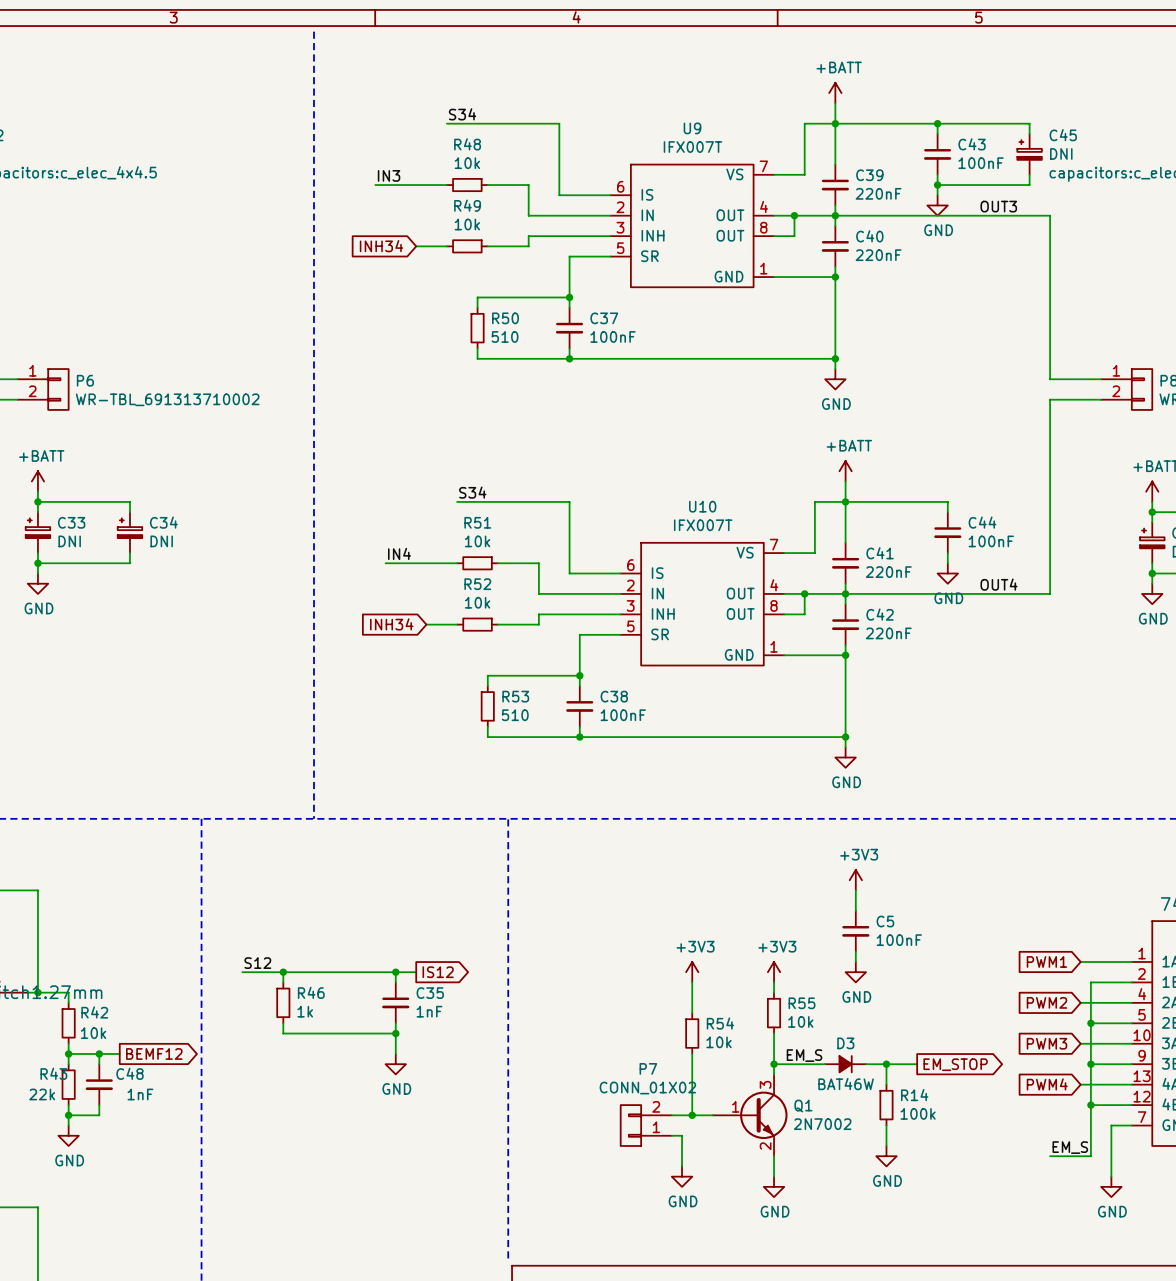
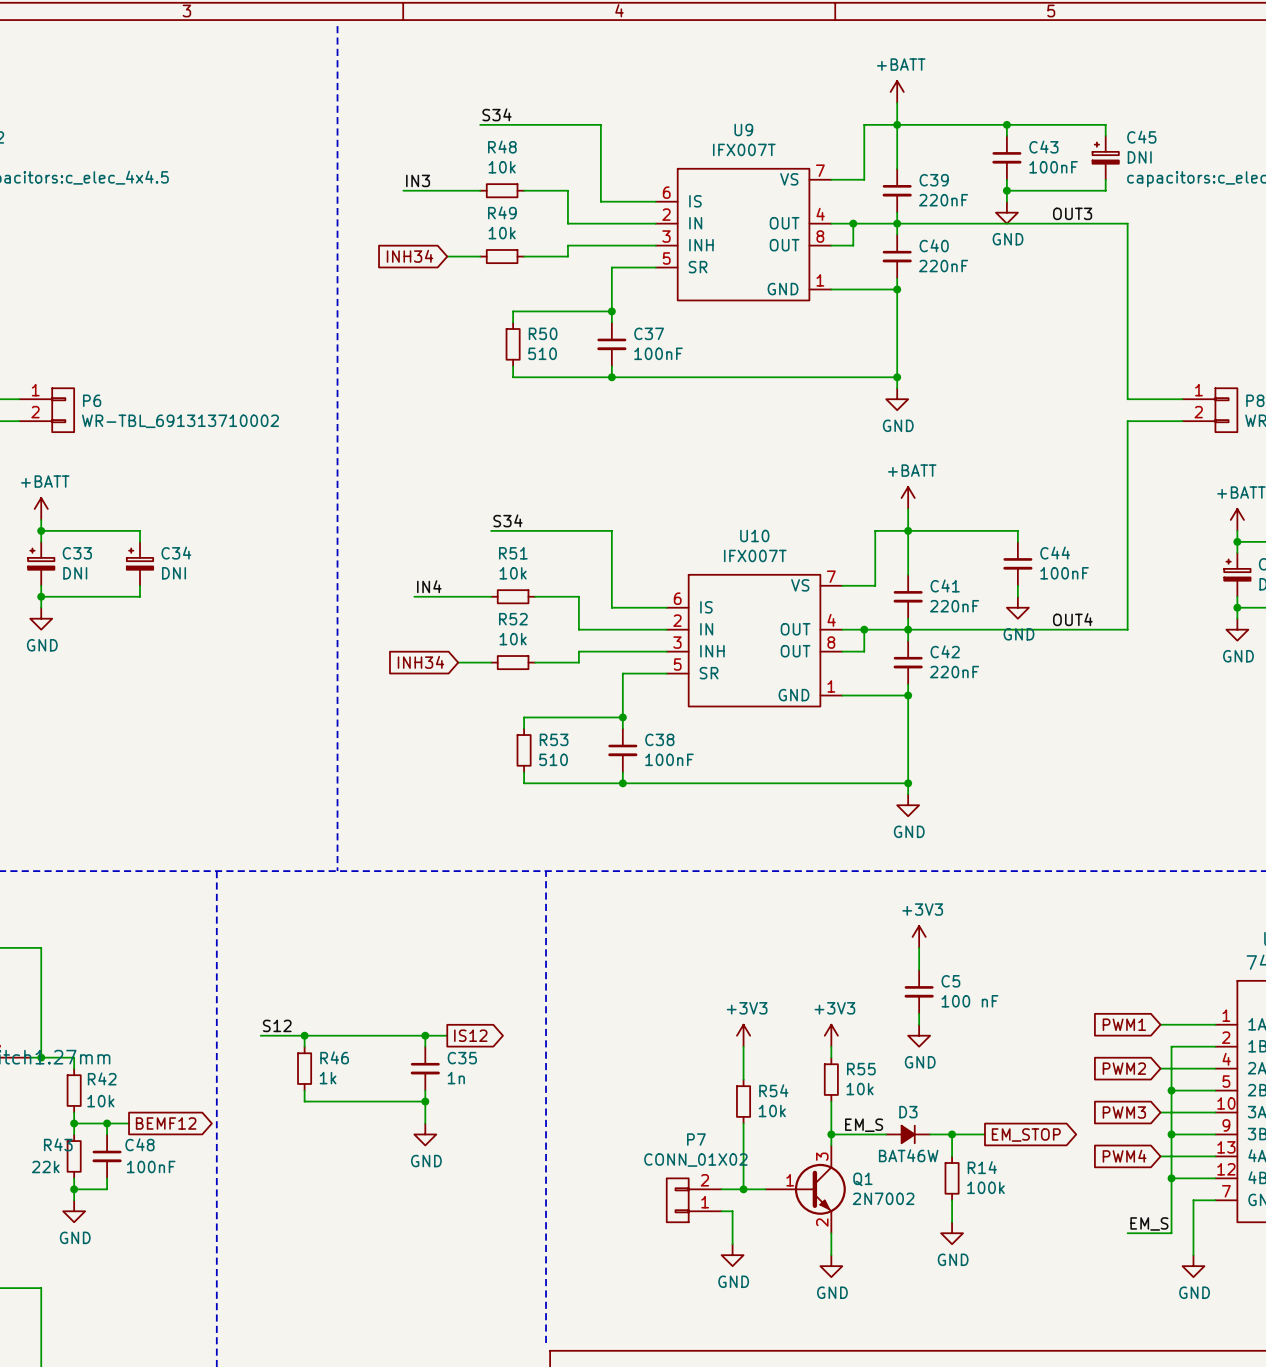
C5 value: 100nF (899, 940) -> 100 nF (969, 1001)
C35 value: 1nF (429, 1011) -> 1n (456, 1078)
C48 value: 1nF (140, 1094) -> 100nF (151, 1166)

